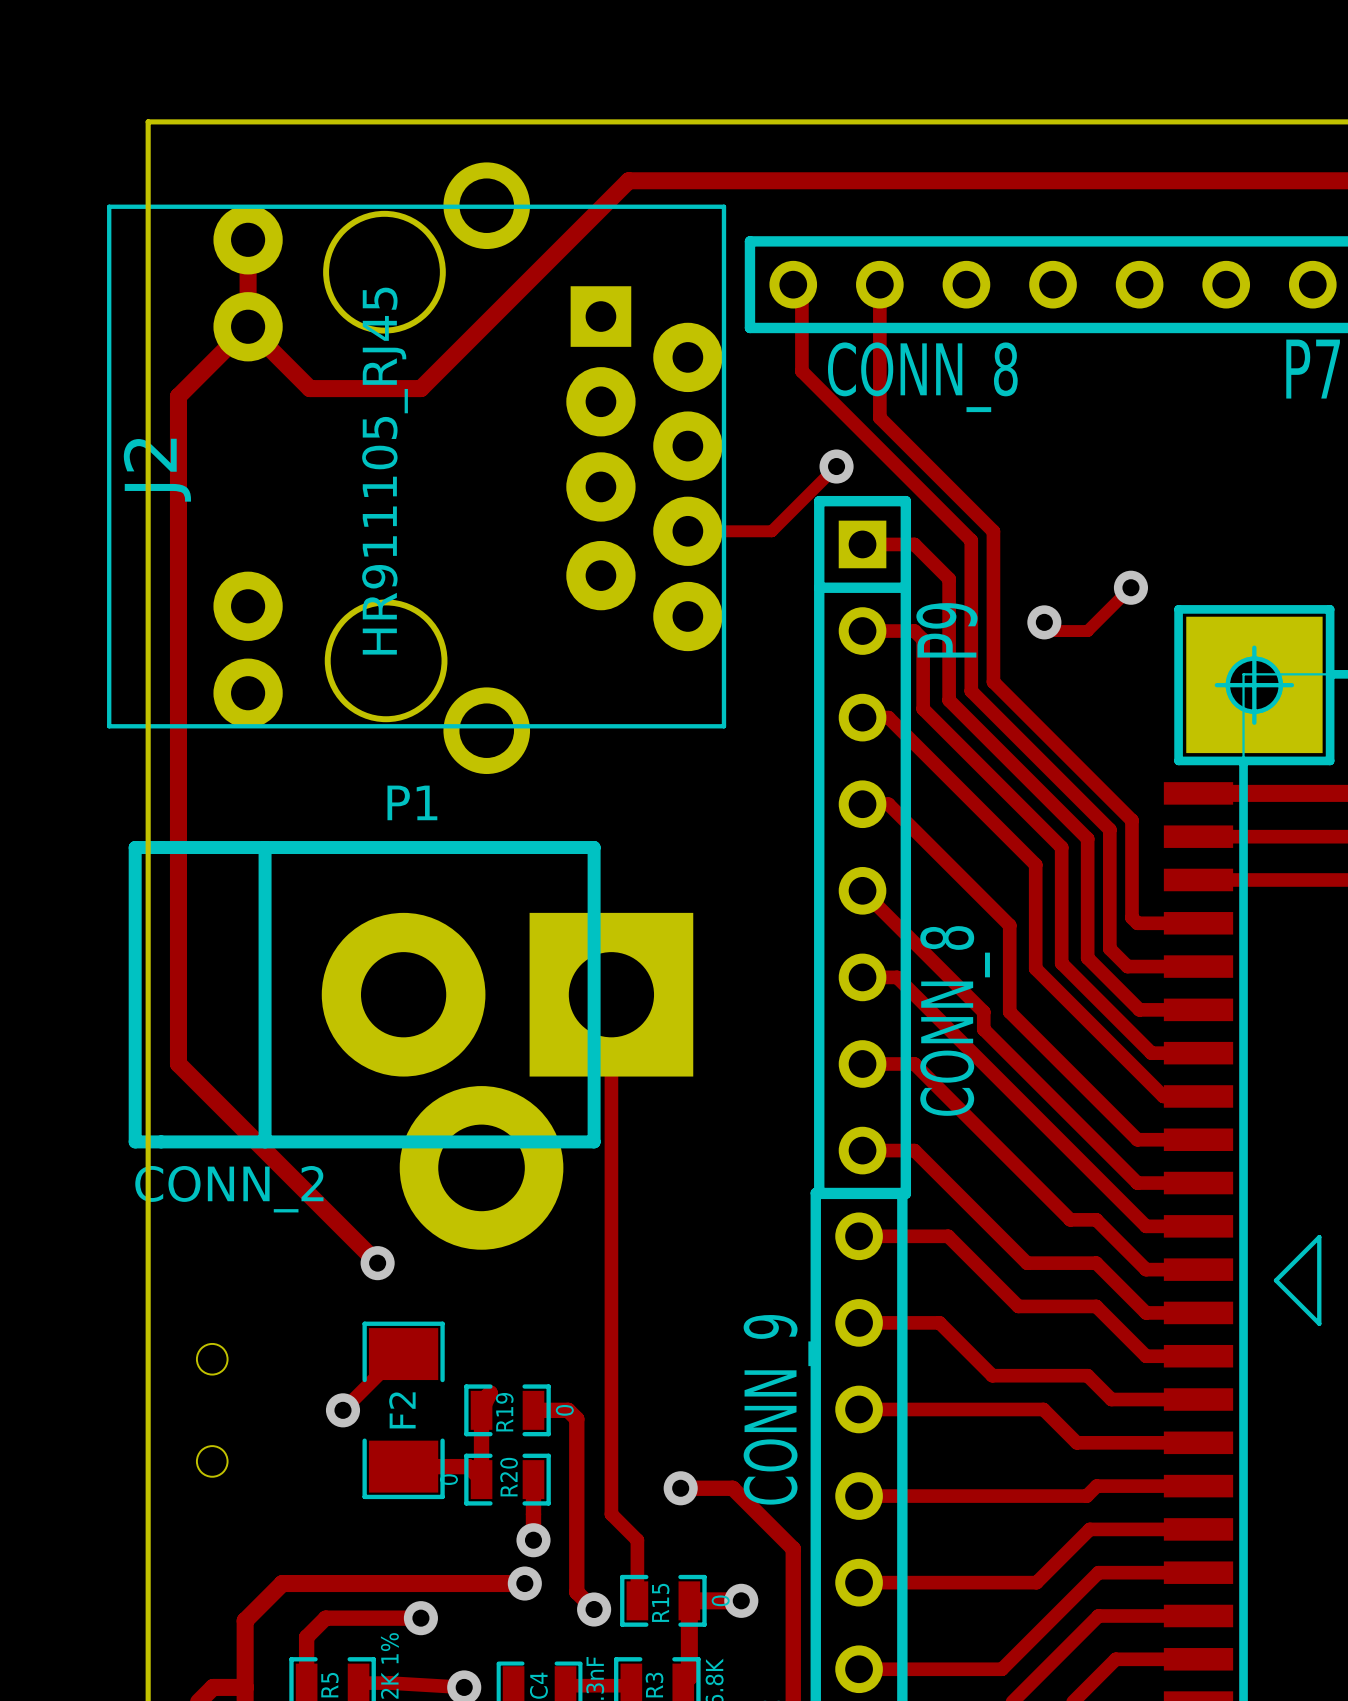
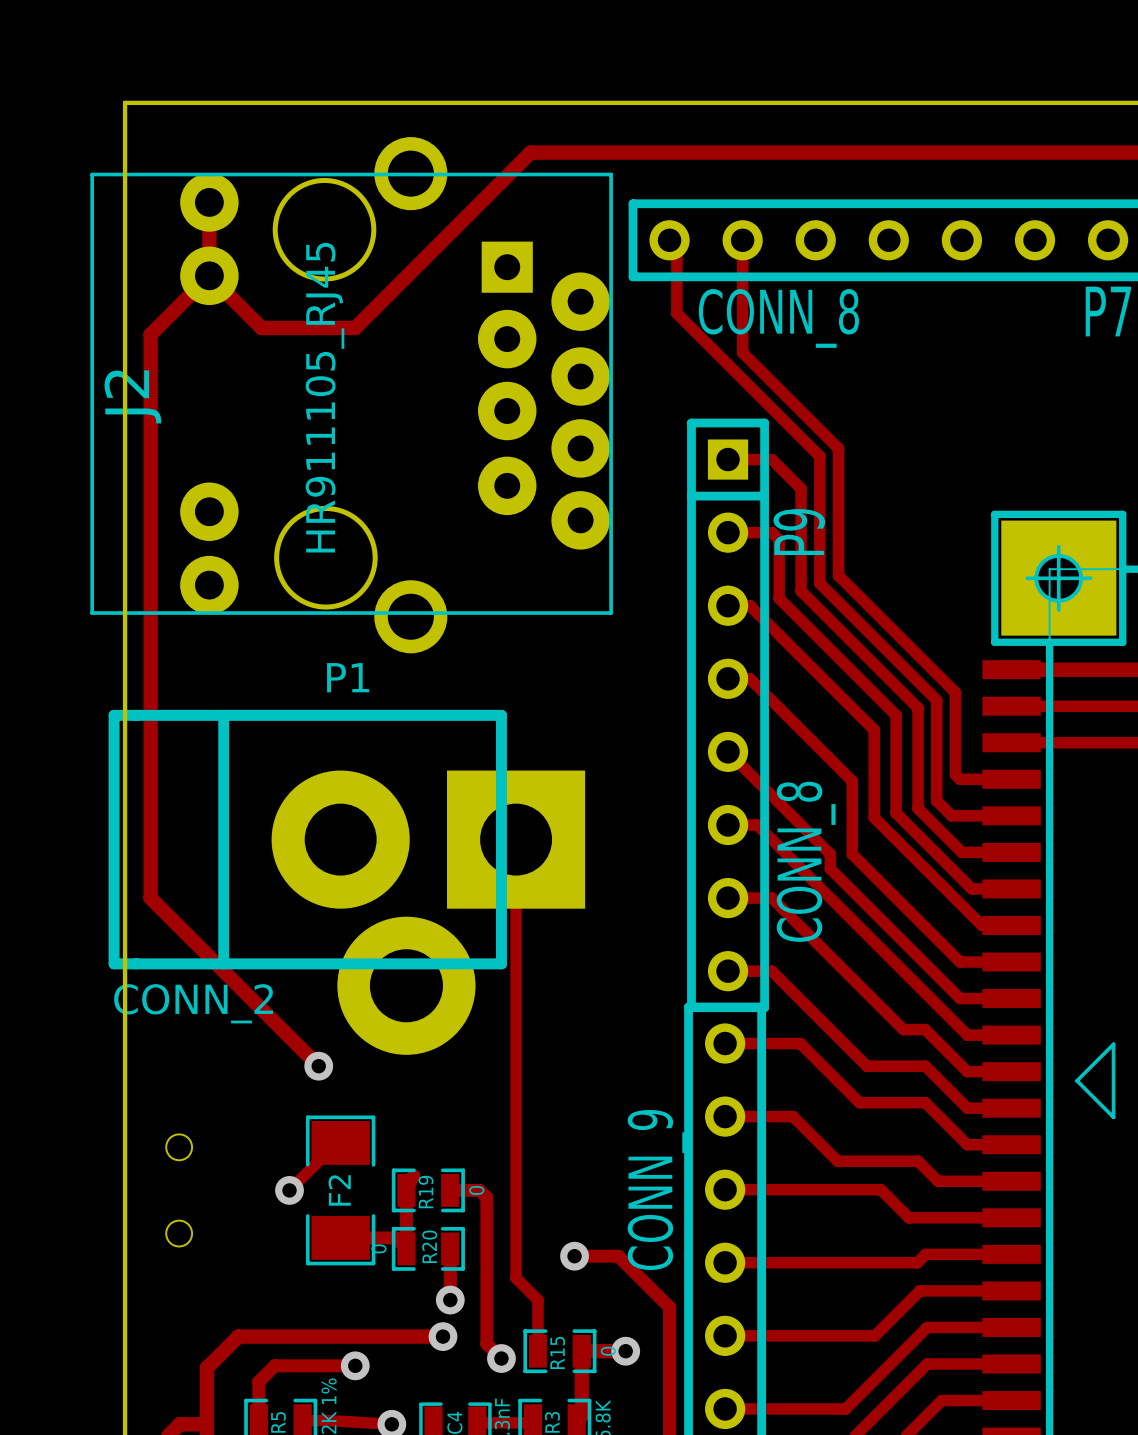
track: (836, 466) (771, 531) (687, 531) -> none
via: (836, 466) -> none
track: (1130, 587) (1087, 631) (1053, 631) (1044, 622) -> none
via: (1130, 587) -> none
via: (1044, 622) -> none

